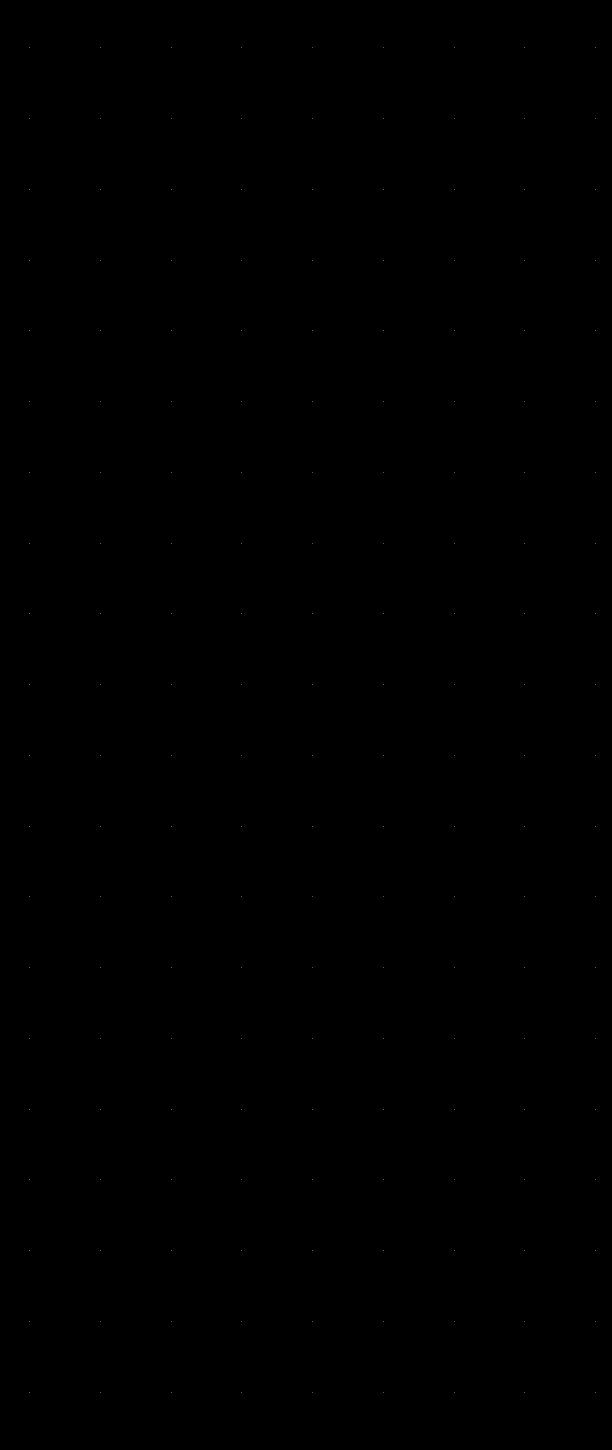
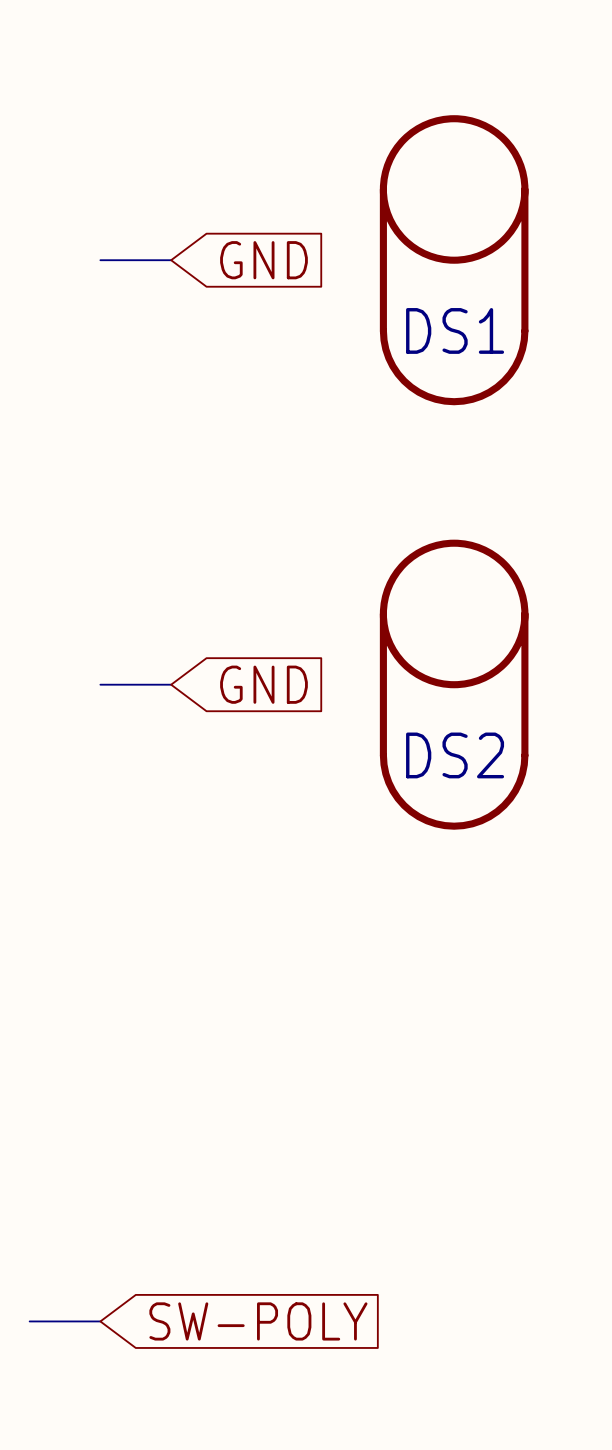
wire: none -> (100, 260) (171, 260)
global label: none -> GND (263, 260)
DS1: none -> (454, 260)
wire: none -> (100, 684) (171, 684)
global label: none -> GND (263, 684)
DS2: none -> (454, 684)
wire: none -> (29, 1321) (100, 1321)
global label: none -> SW-POLY (258, 1321)

